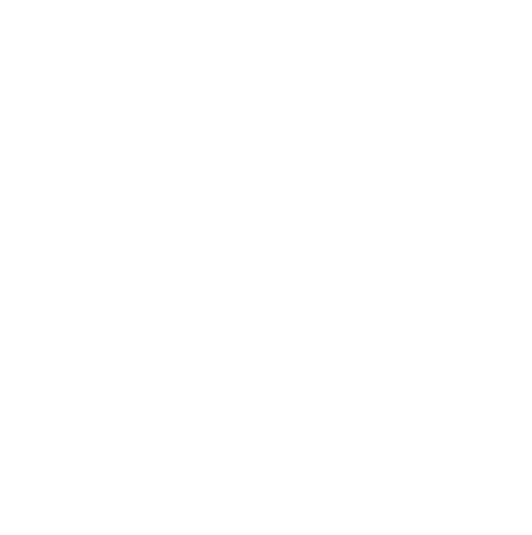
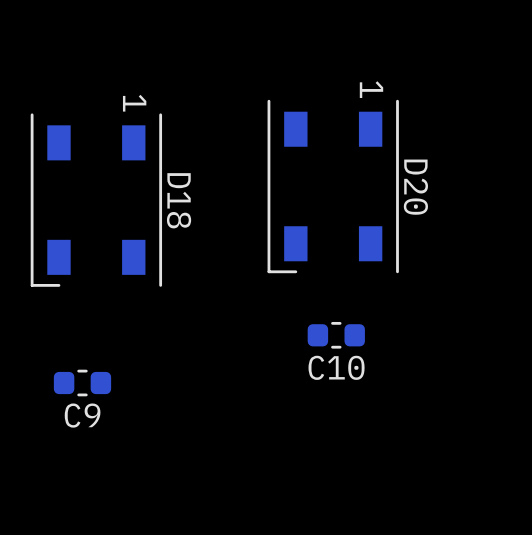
D20: none -> (333, 186)
D18: none -> (96, 200)
C10: none -> (336, 335)
C9: none -> (82, 383)

